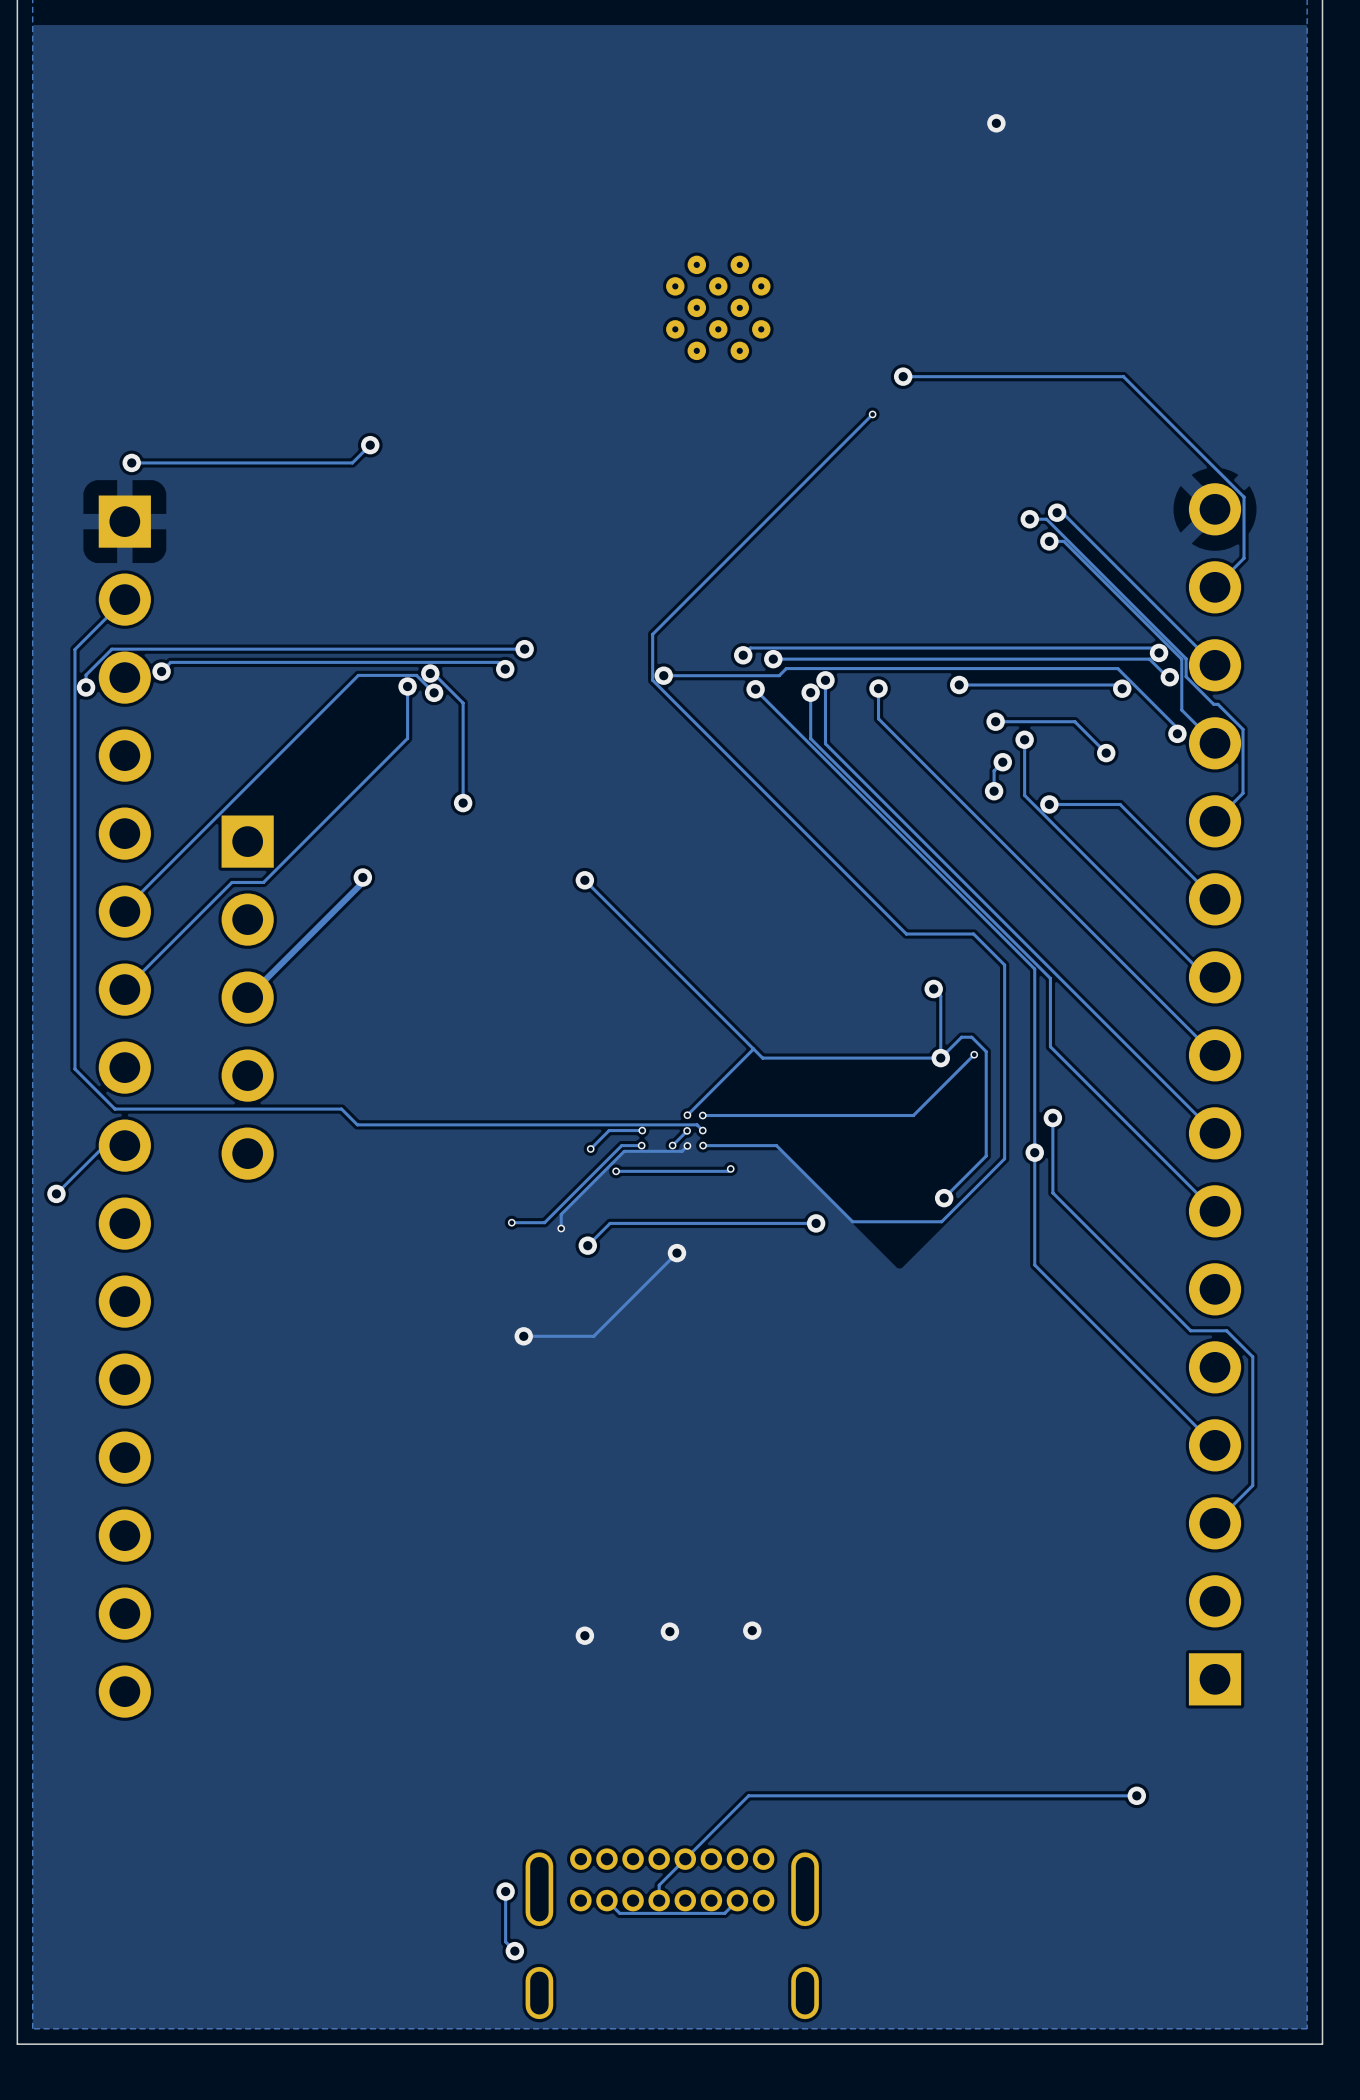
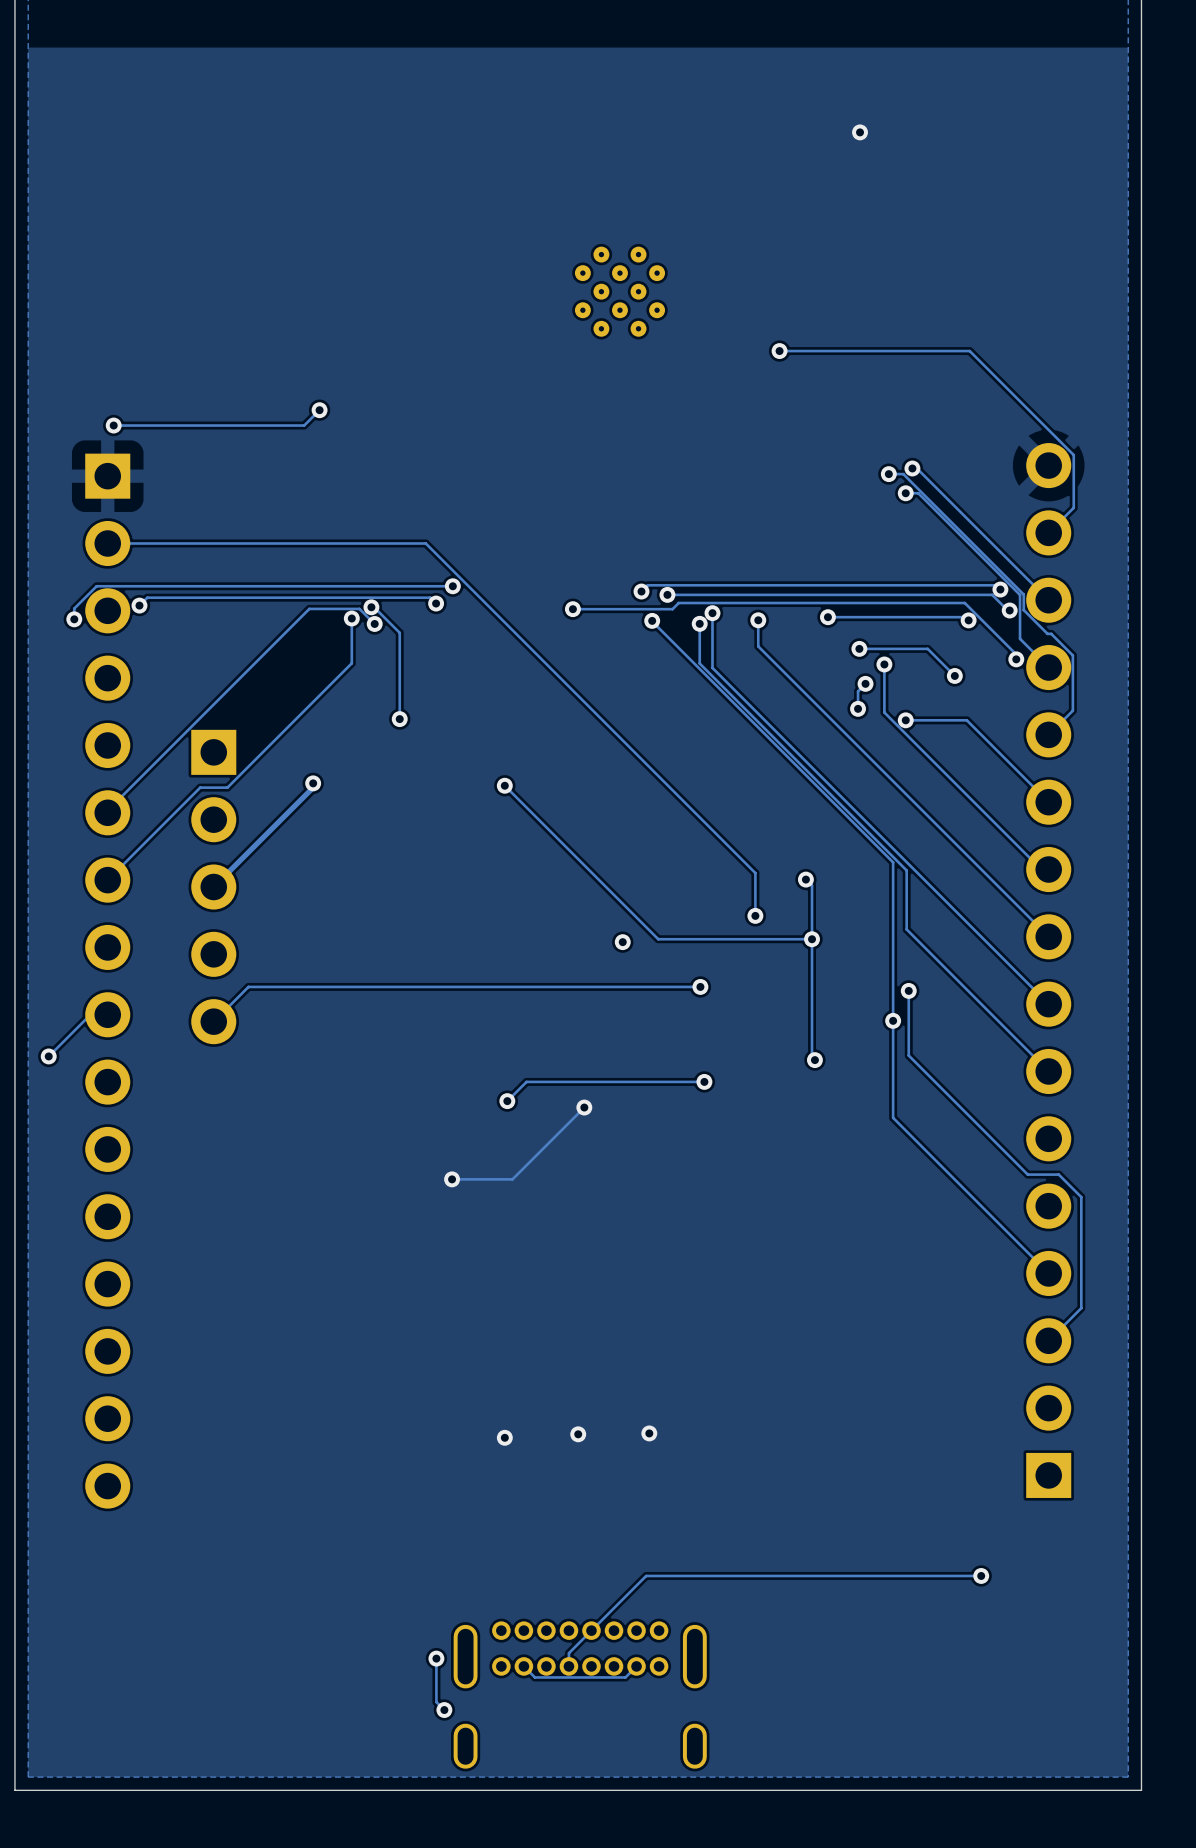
track: (872, 414) (652, 634) (652, 680) (906, 934) (973, 934) (1004, 965) (1004, 1158) (941, 1221) (852, 1221) (776, 1145) (703, 1145) -> none
via: (872, 414) -> none
track: (124, 599) (74, 649) (74, 1069) (115, 1109) (341, 1109) (357, 1124) (697, 1124) (702, 1130) -> (107, 543) (425, 543) (755, 873) (755, 915)
via: none -> (755, 915)
track: (753, 1049) (687, 1115) -> none
track: (974, 1054) (913, 1115) (702, 1115) -> none
via: (974, 1054) -> none
track: (940, 1058) (961, 1037) (971, 1037) (986, 1051) (986, 1156) (944, 1198) -> (812, 939) (812, 1057)
via: none -> (622, 942)
track: none -> (700, 986) (248, 986) (213, 1021)
via: none -> (700, 986)
via: (687, 1115) -> none
via: (702, 1115) -> none
track: (642, 1130) (609, 1130) (590, 1148) -> none
via: (642, 1130) -> none
via: (687, 1130) -> none
via: (702, 1130) -> none
track: (687, 1131) (672, 1145) -> none
track: (641, 1145) (621, 1145) (544, 1222) (511, 1222) -> none
via: (641, 1145) -> none
via: (672, 1145) -> none
track: (687, 1145) (682, 1151) (624, 1151) (561, 1214) (561, 1228) -> none
via: (687, 1145) -> none
via: (703, 1145) -> none
via: (590, 1148) -> none
track: (730, 1168) (728, 1171) (616, 1171) -> none
via: (730, 1168) -> none
via: (616, 1171) -> none
via: (511, 1222) -> none
via: (561, 1228) -> none

